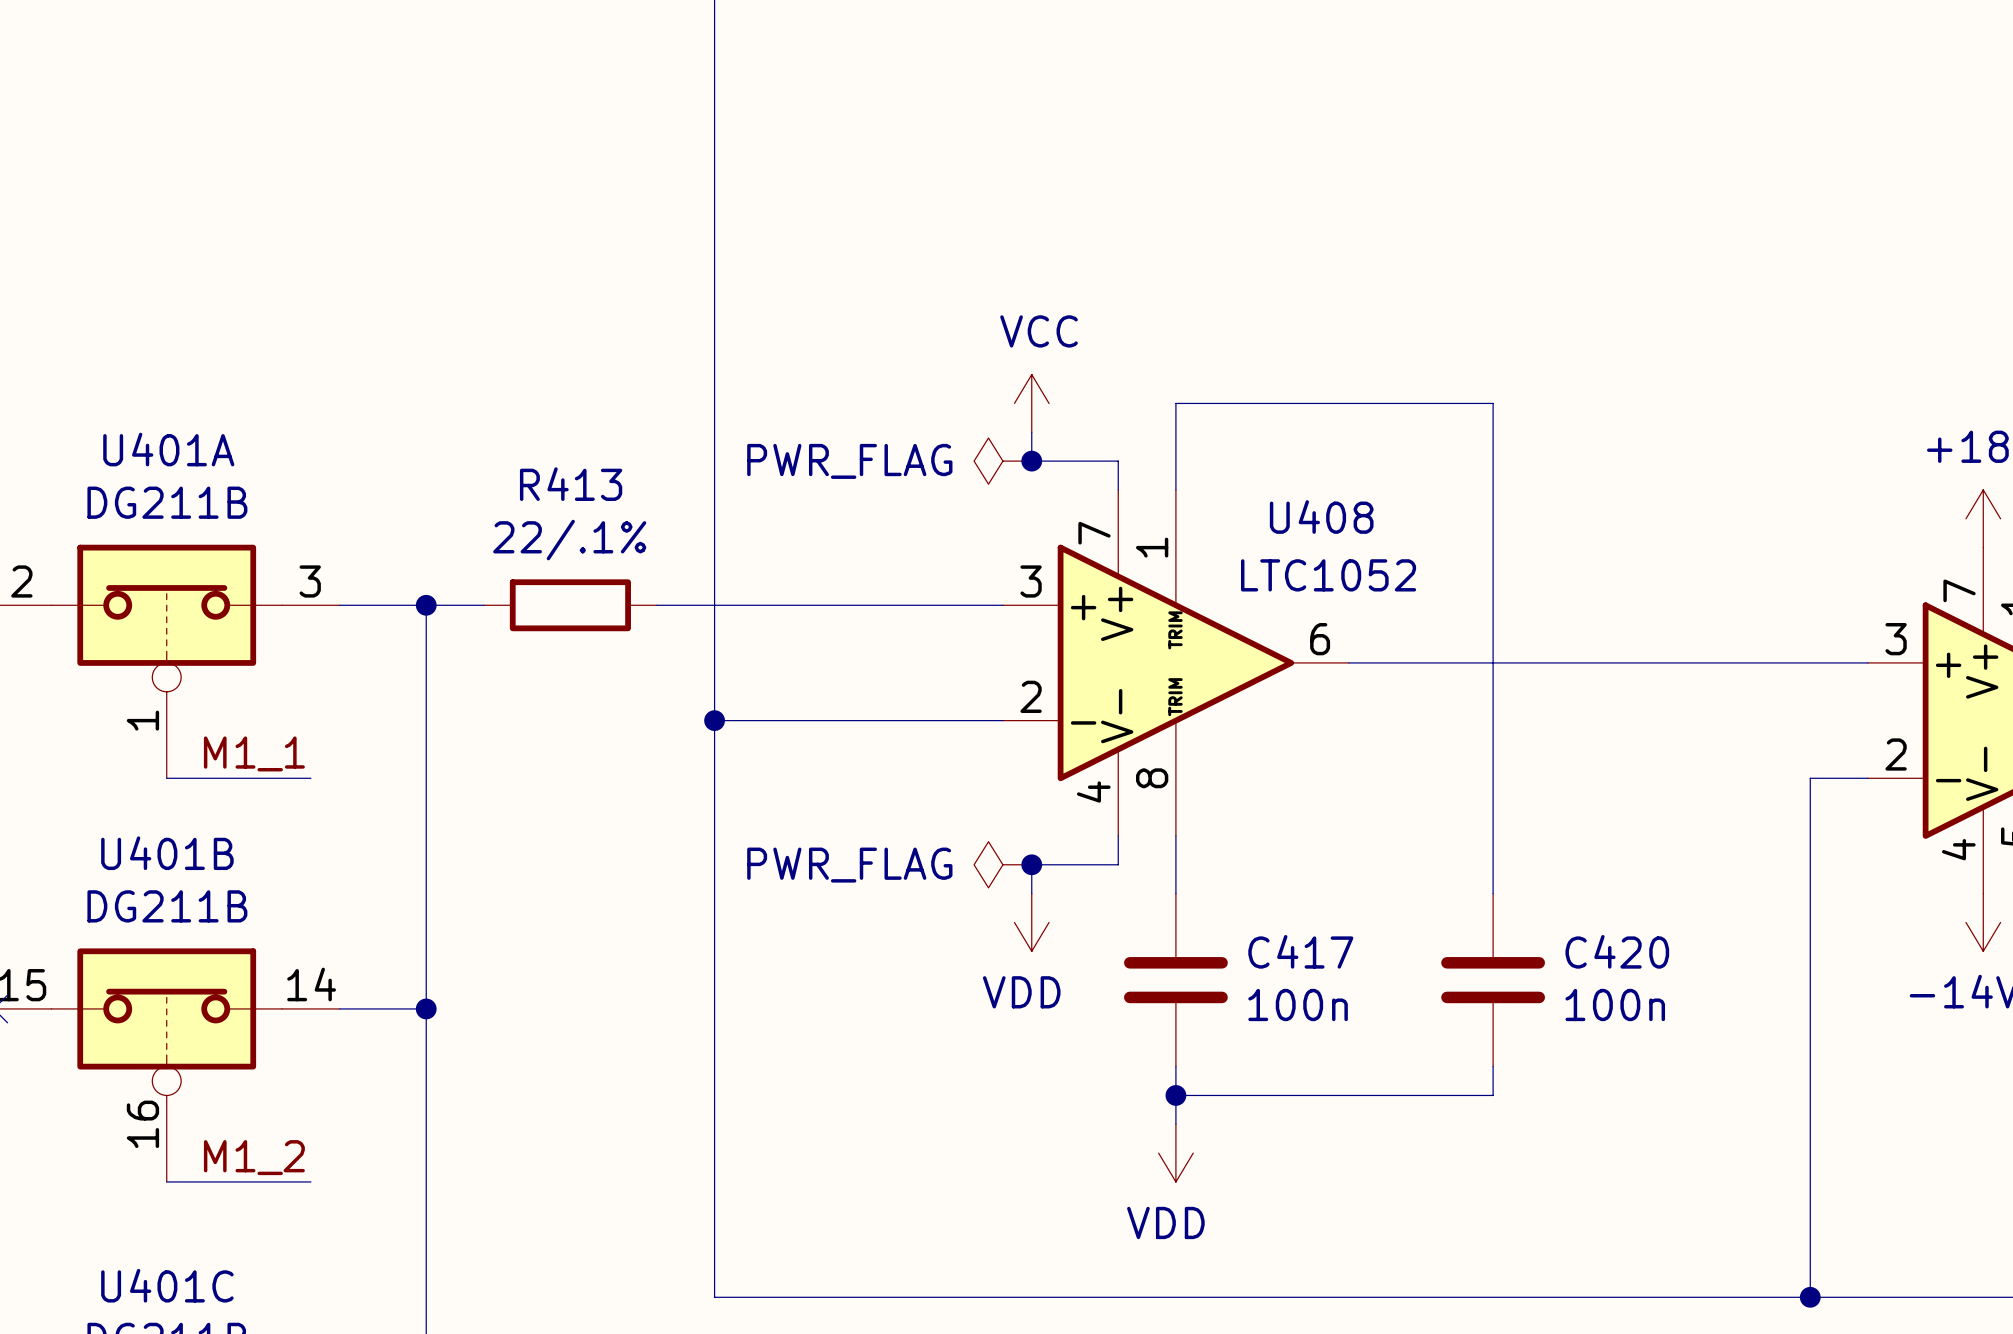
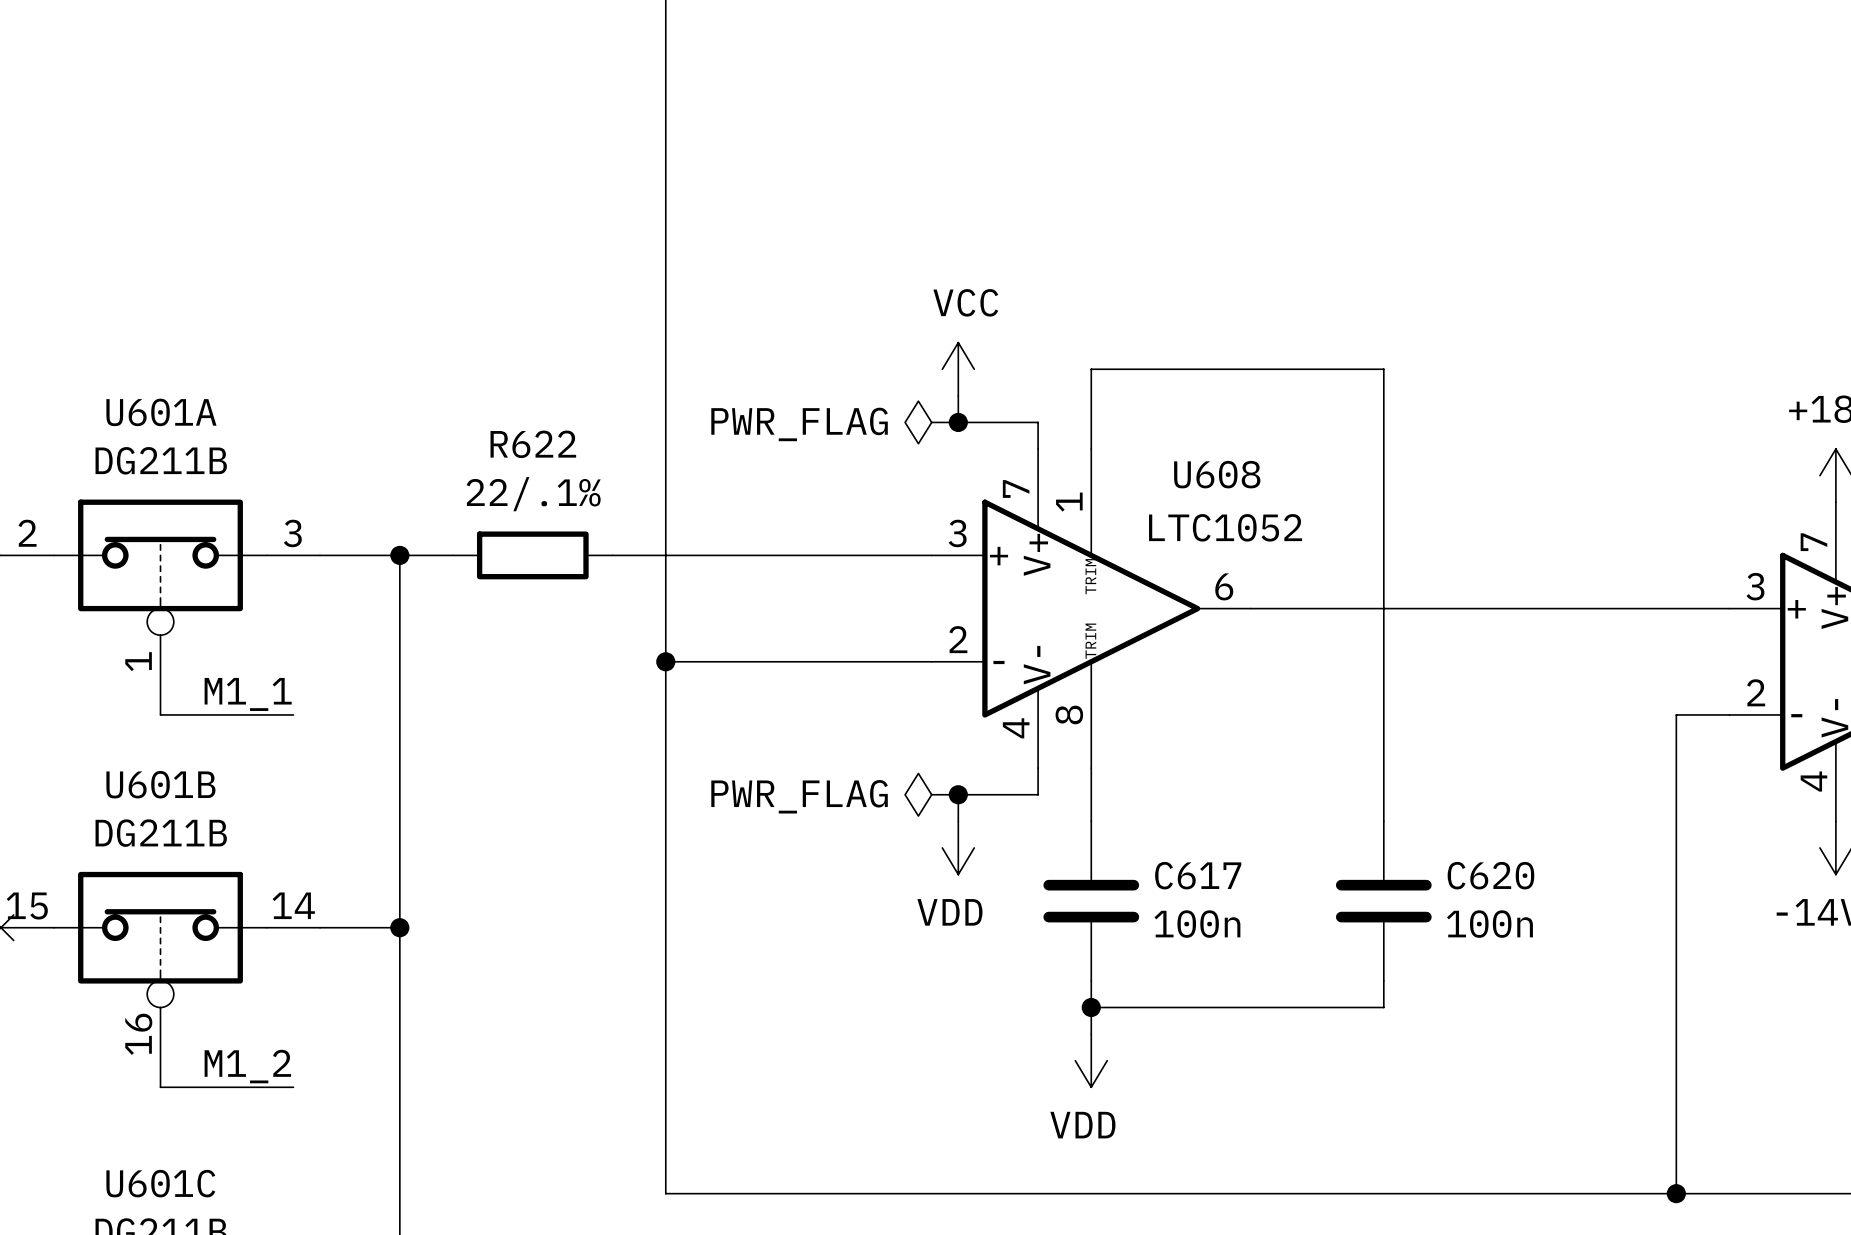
U401A name: U401A (168, 449) -> U601A (161, 412)
R413 name: R413 (571, 484) -> R622 (533, 444)
U408 name: U408 (1321, 517) -> U608 (1217, 474)
U401B name: U401B (167, 853) -> U601B (160, 784)
C417 name: C417 (1300, 951) -> C617 (1198, 875)
C420 name: C420 (1617, 951) -> C620 (1490, 875)
U401C name: U401C (167, 1285) -> U601C (160, 1183)

